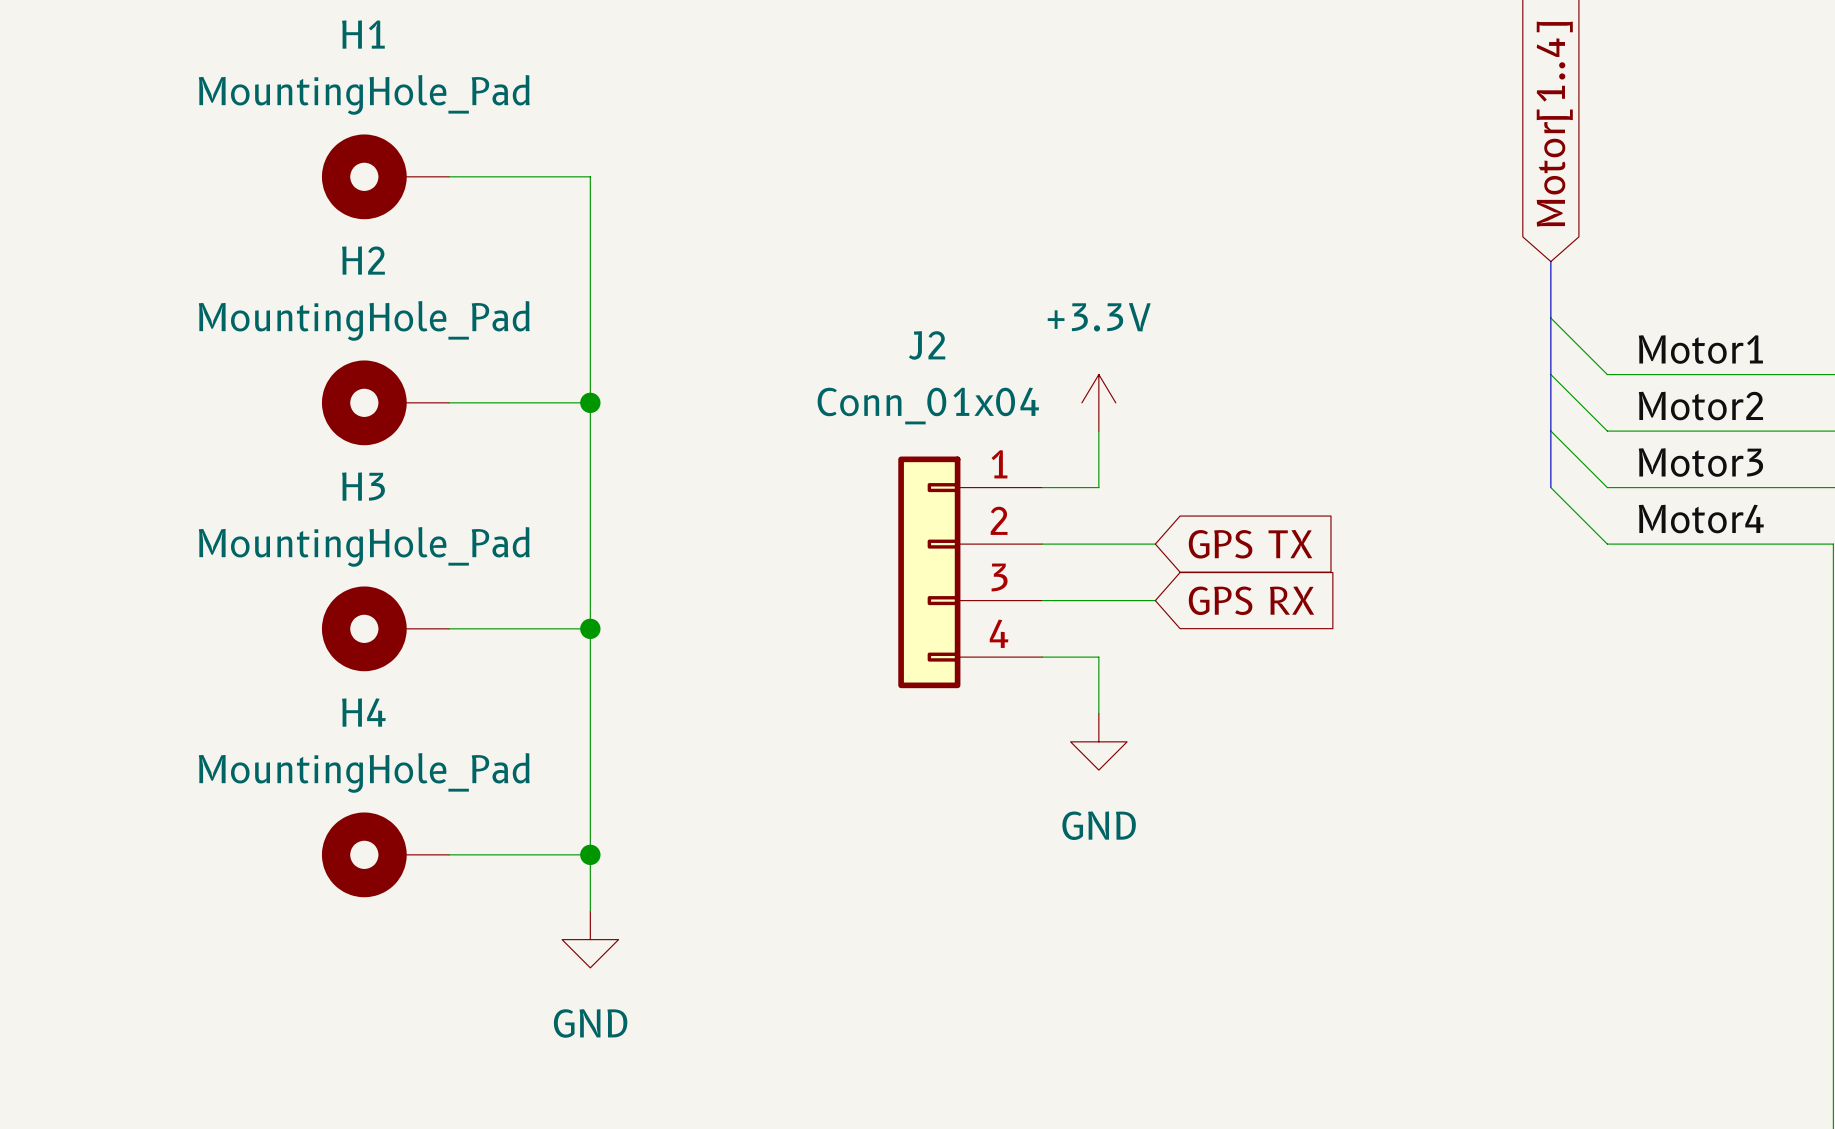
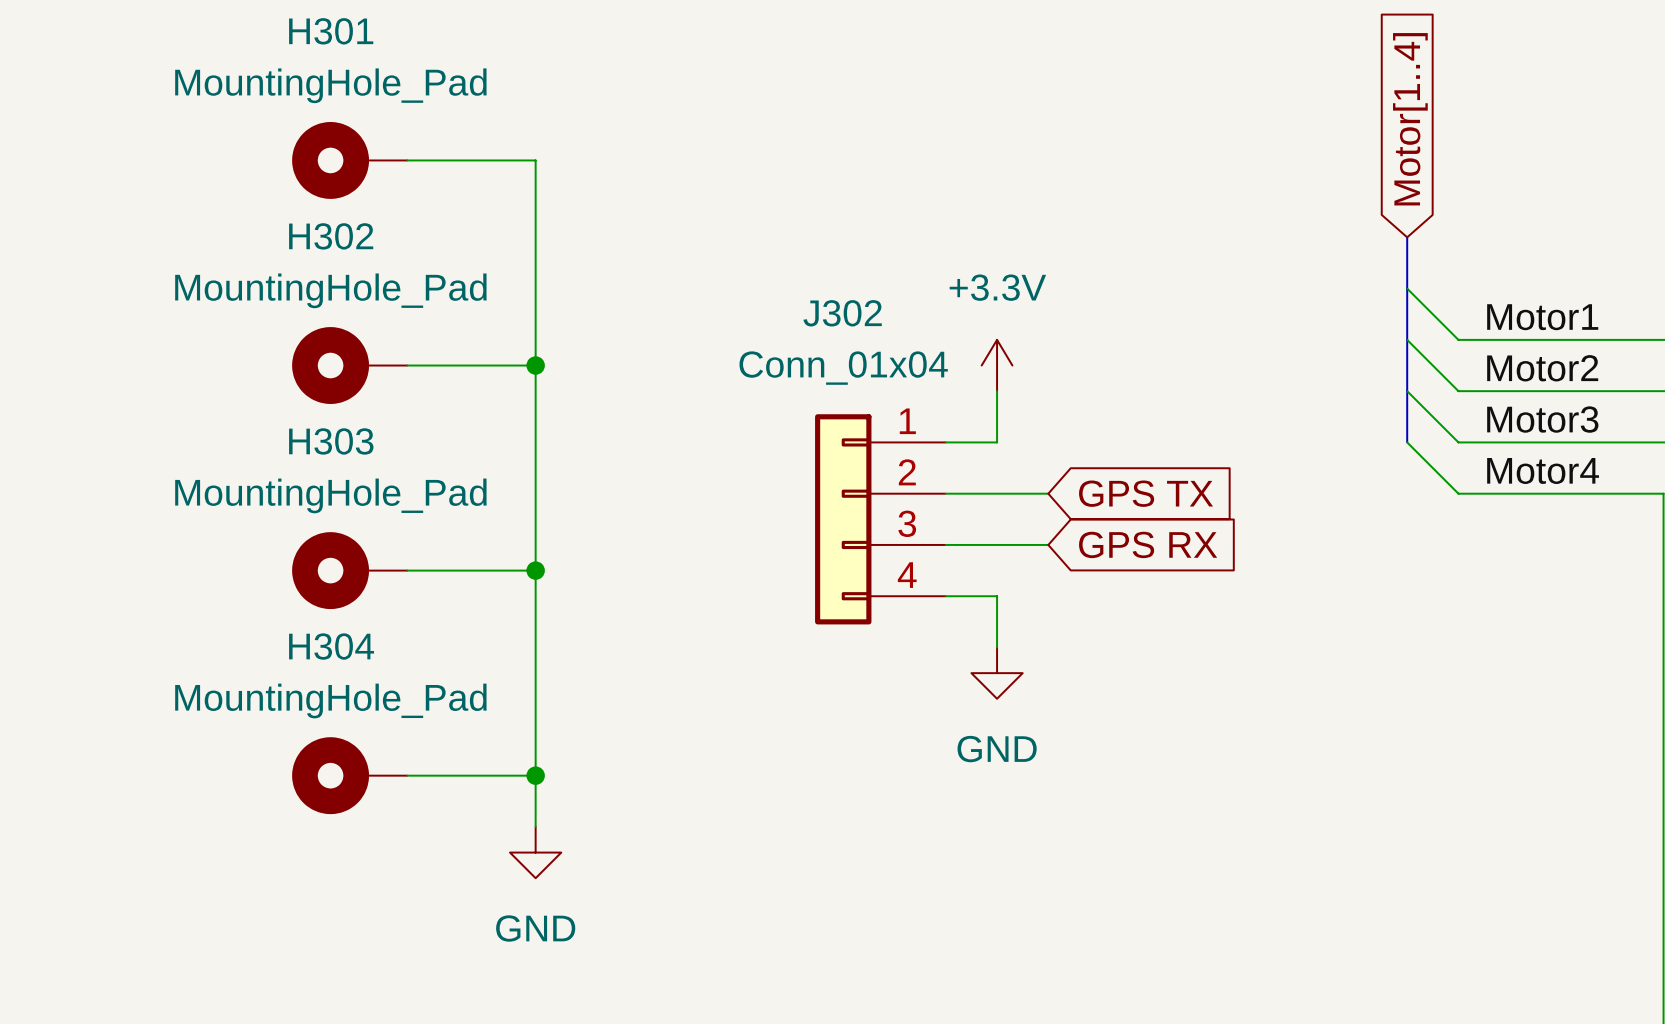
H1 name: H1 (363, 34) -> H301 (331, 31)
H2 name: H2 (363, 260) -> H302 (331, 236)
J2 name: J2 (927, 345) -> J302 (842, 313)
H3 name: H3 (363, 486) -> H303 (331, 441)
H4 name: H4 (363, 712) -> H304 (331, 646)

